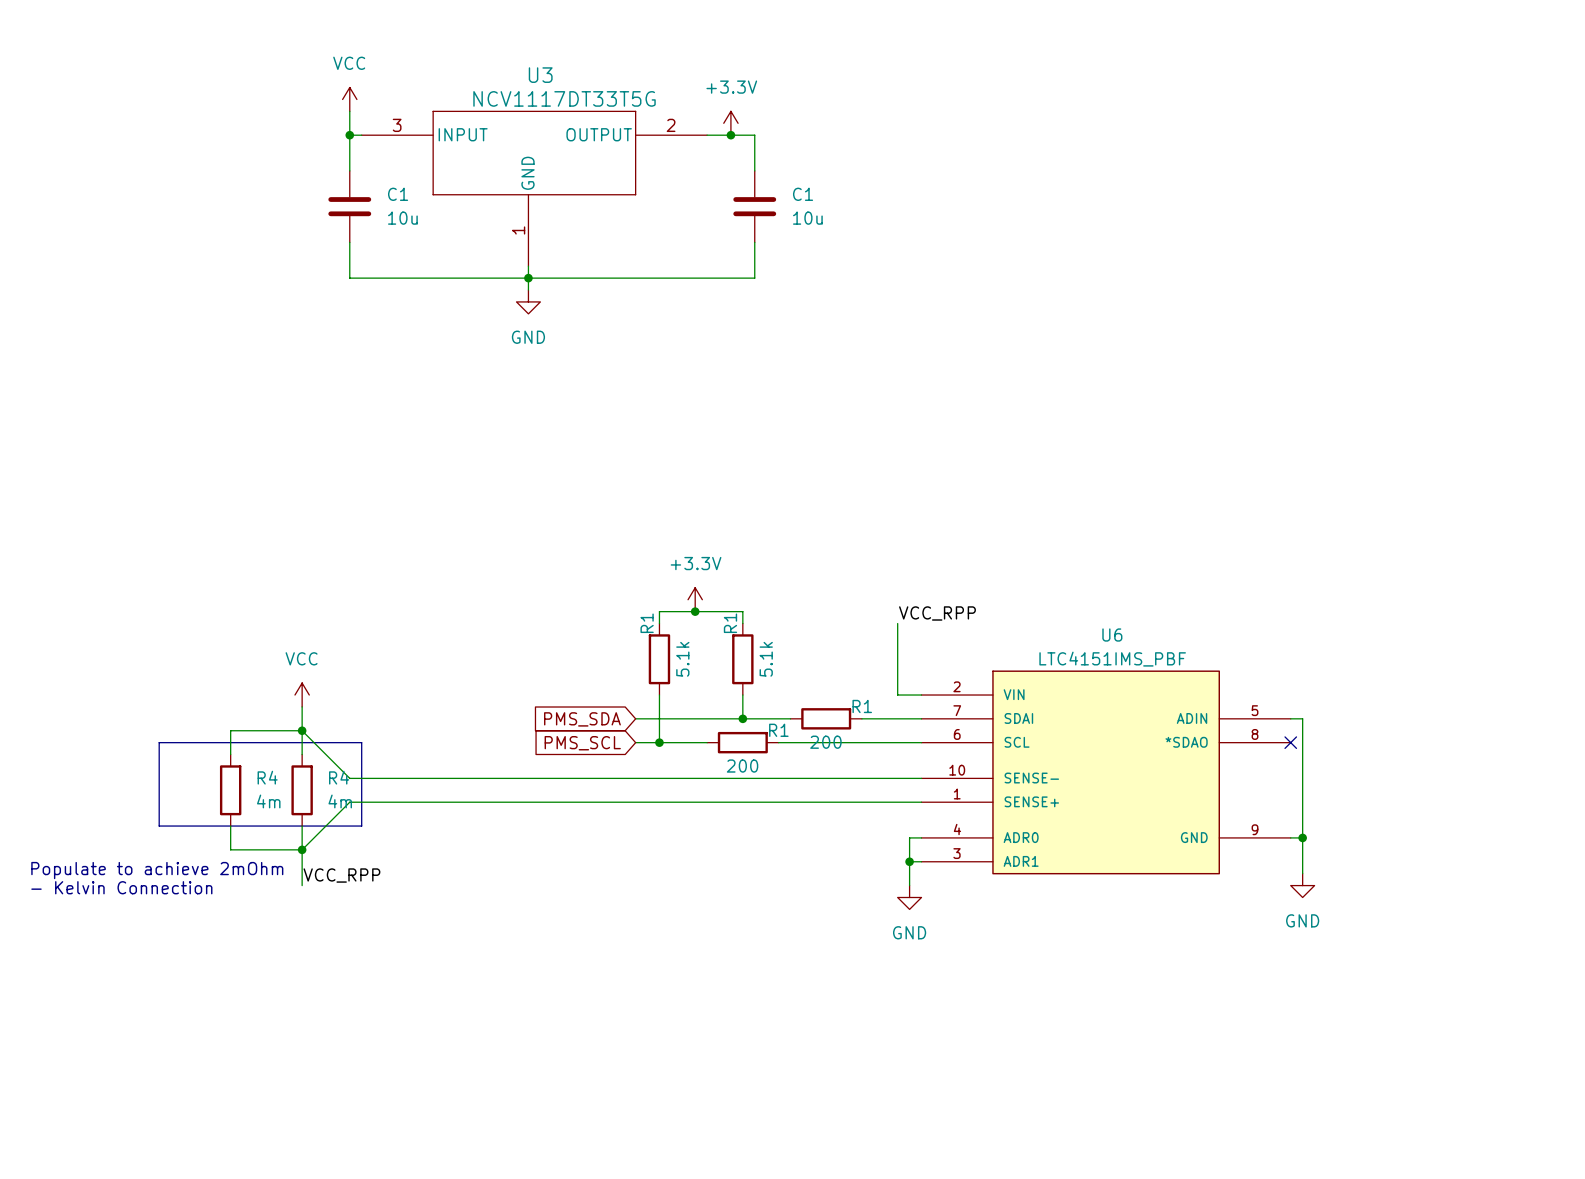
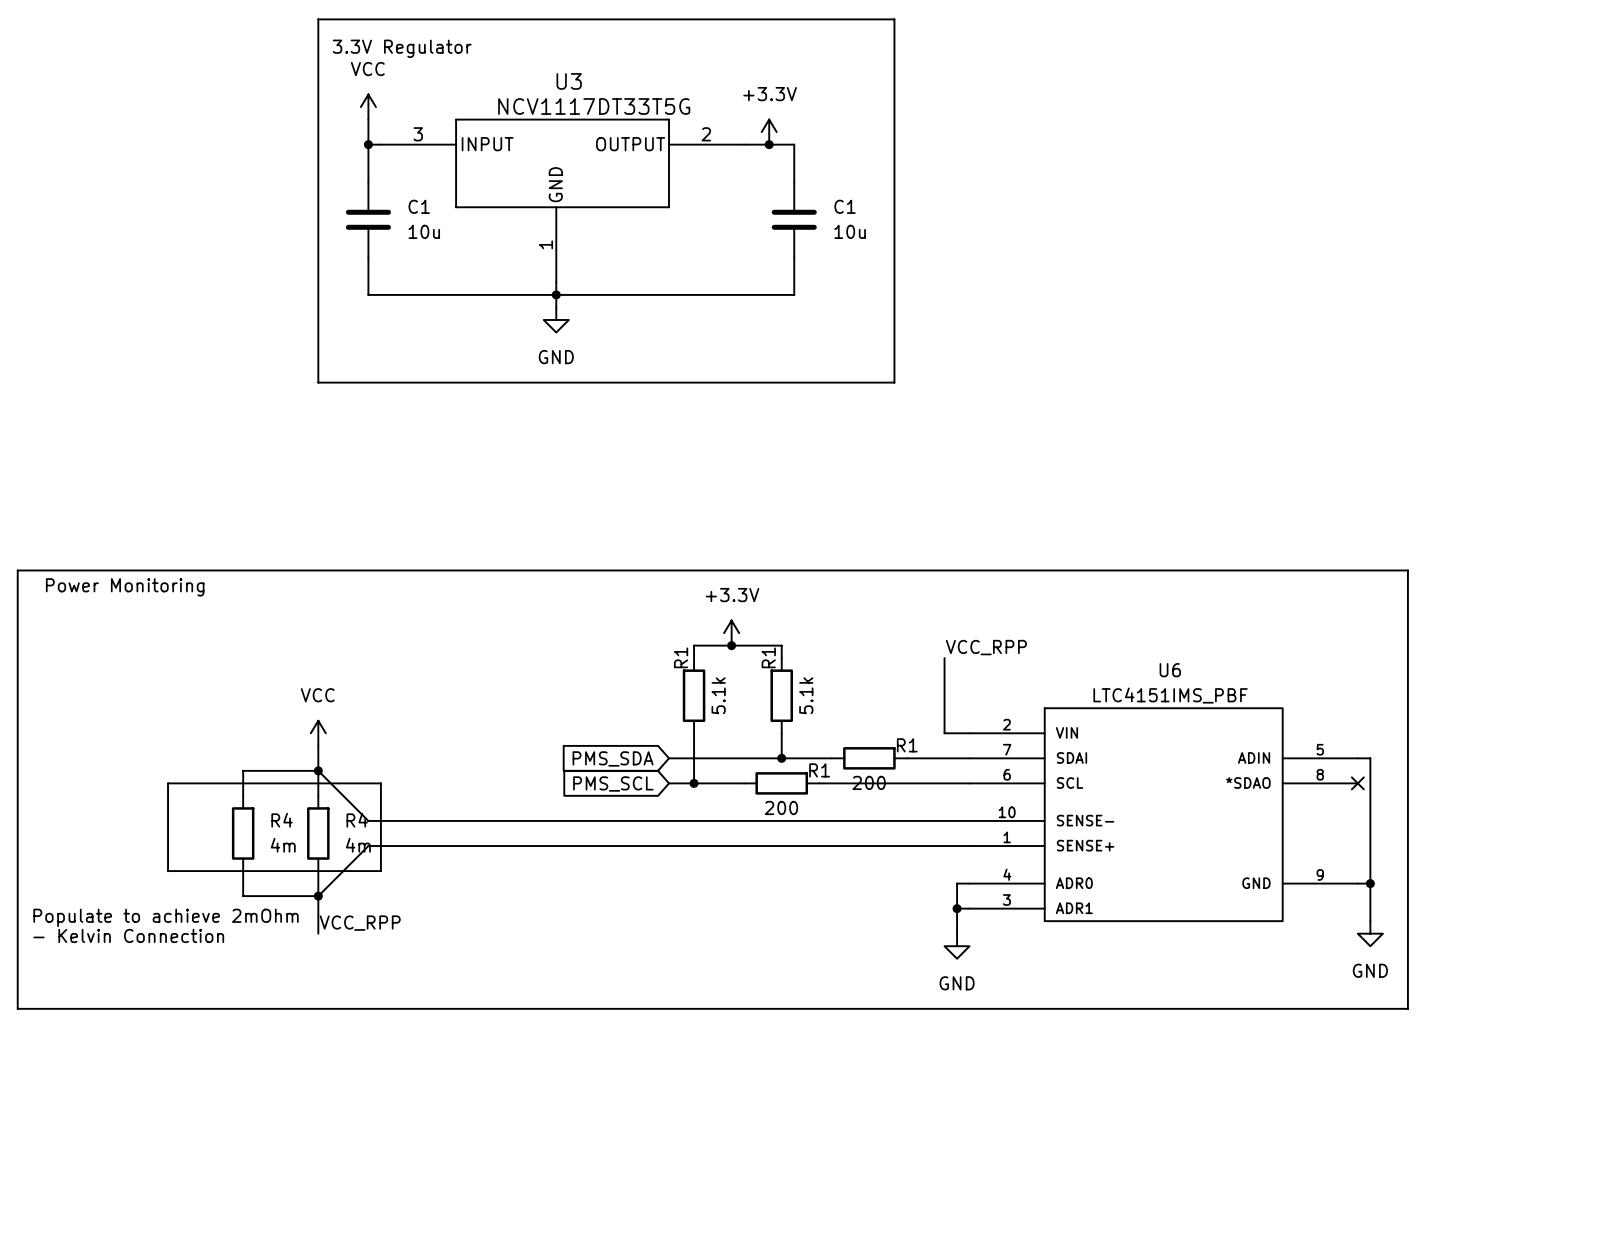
line: none -> (318, 19) (894, 19) (894, 382) (318, 382) (318, 19)
text: none -> 3.3V Regulator (402, 48)
line: none -> (17, 570) (1407, 570) (1407, 1008) (17, 1008) (17, 570)
text: none -> Power Monitoring (125, 587)

